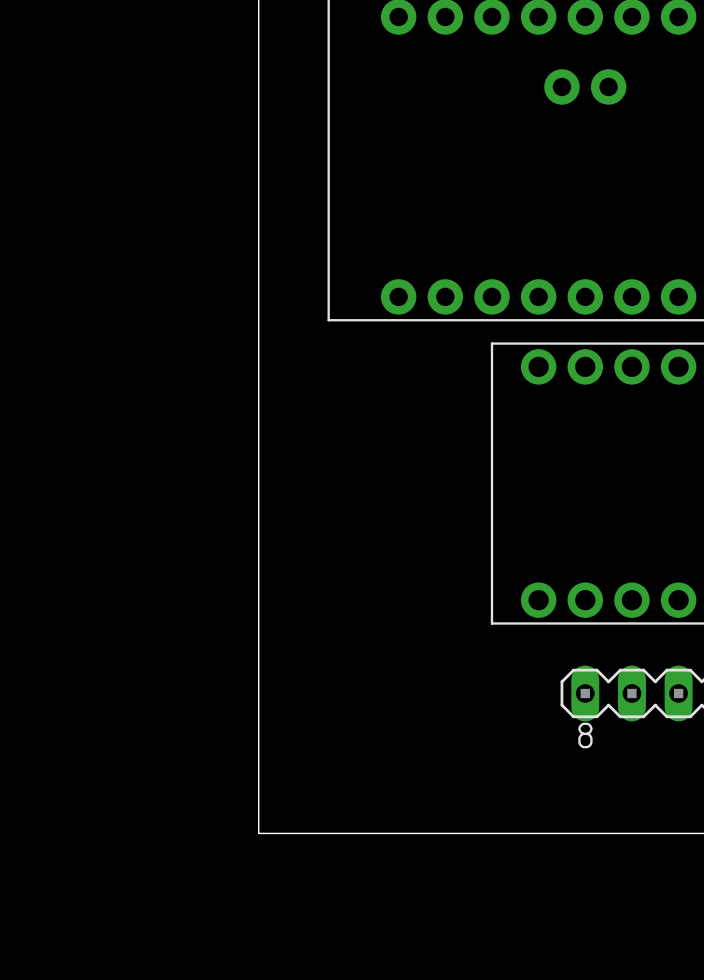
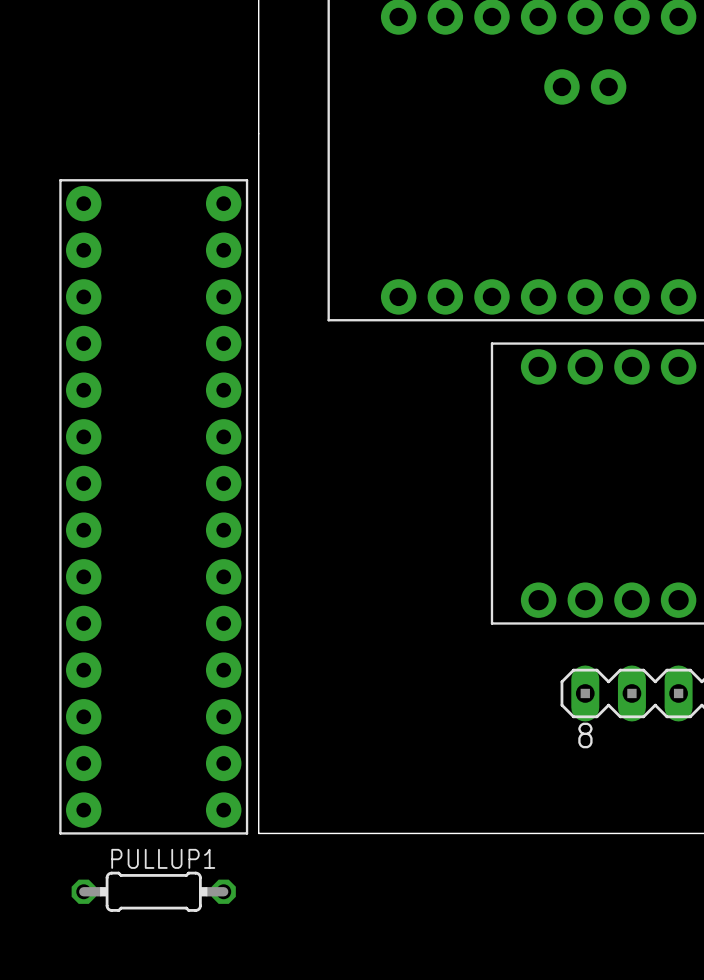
part: none -> (153, 506)
PULLUP1: none -> (153, 891)

